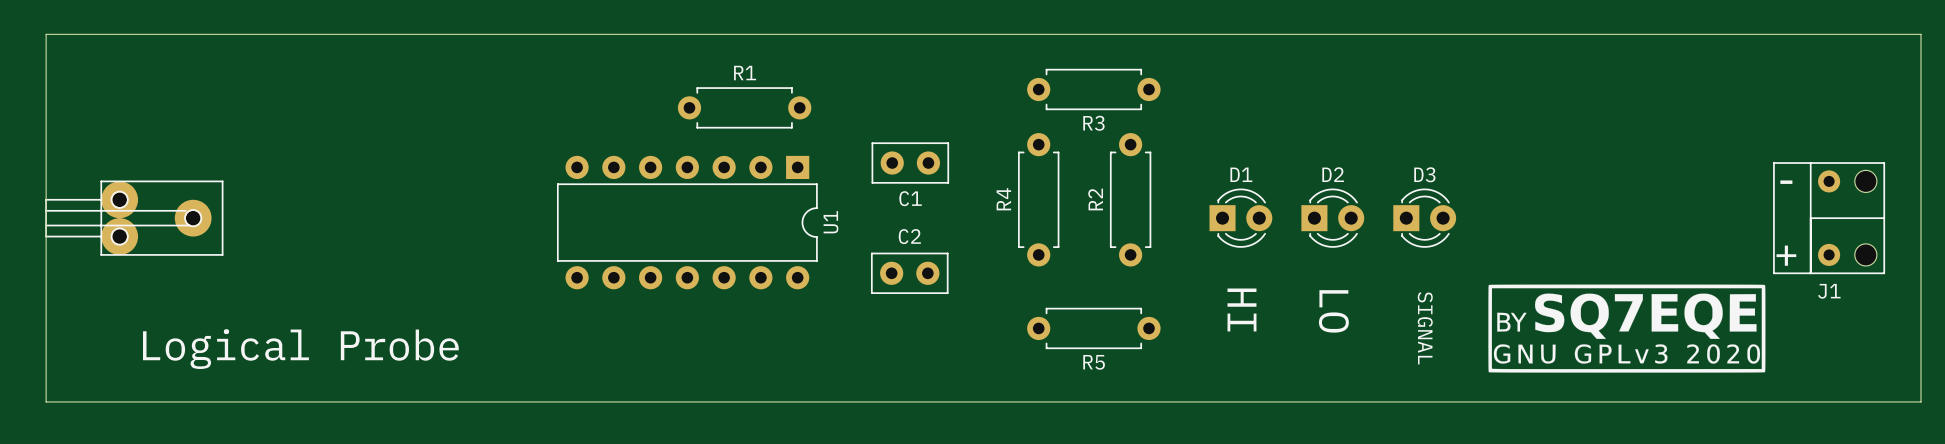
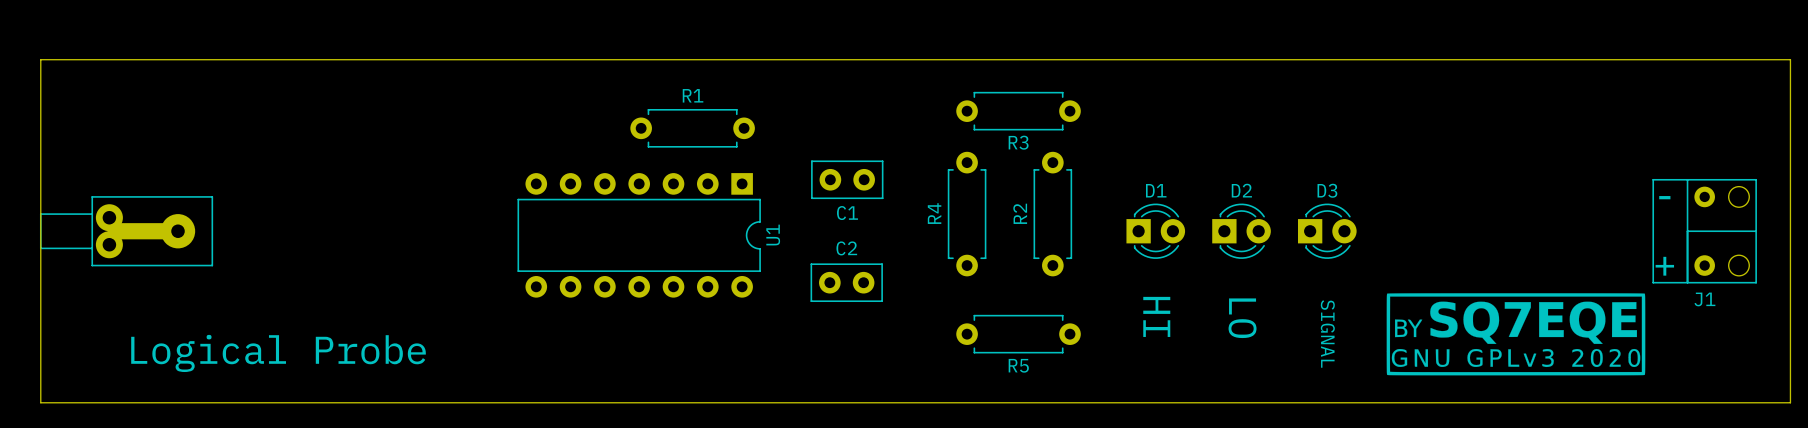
part footprint: [45, 180, 224, 256] -> [39, 196, 214, 267]

